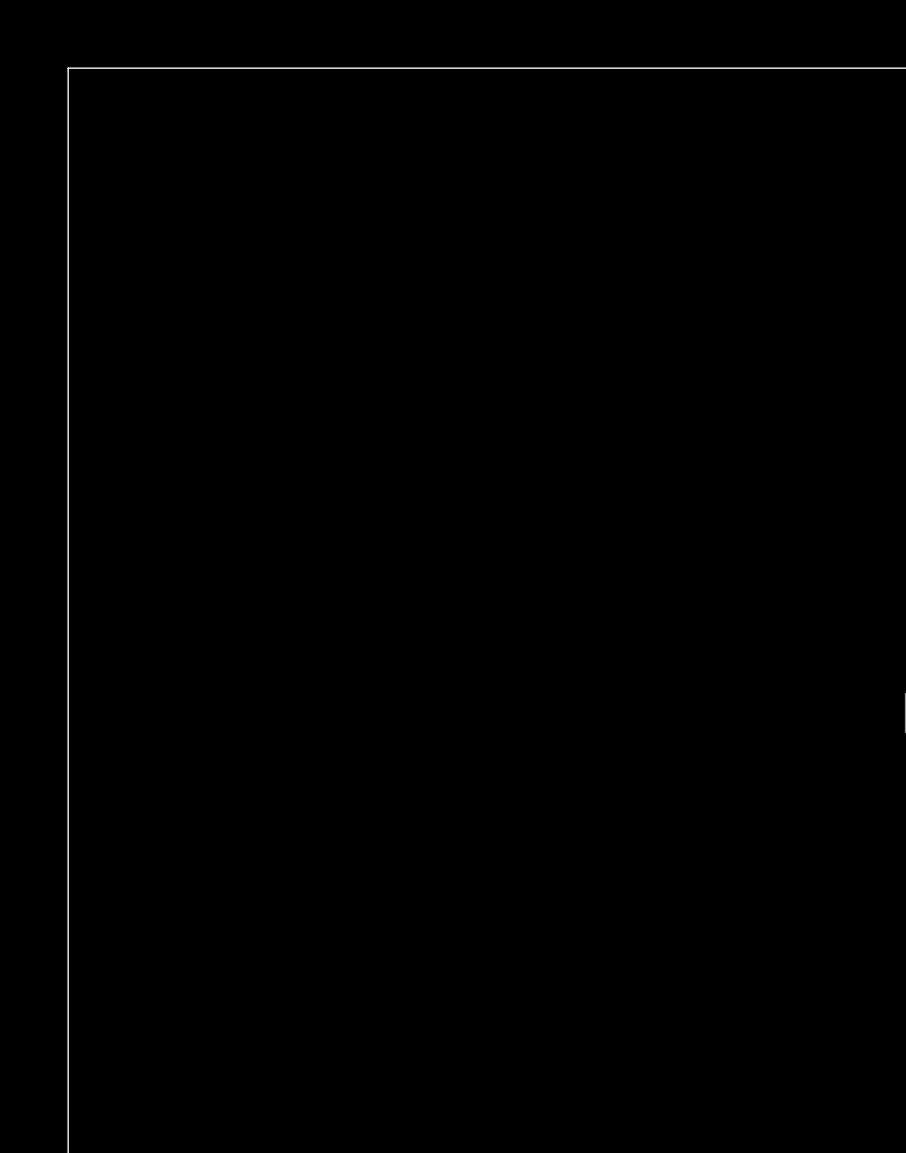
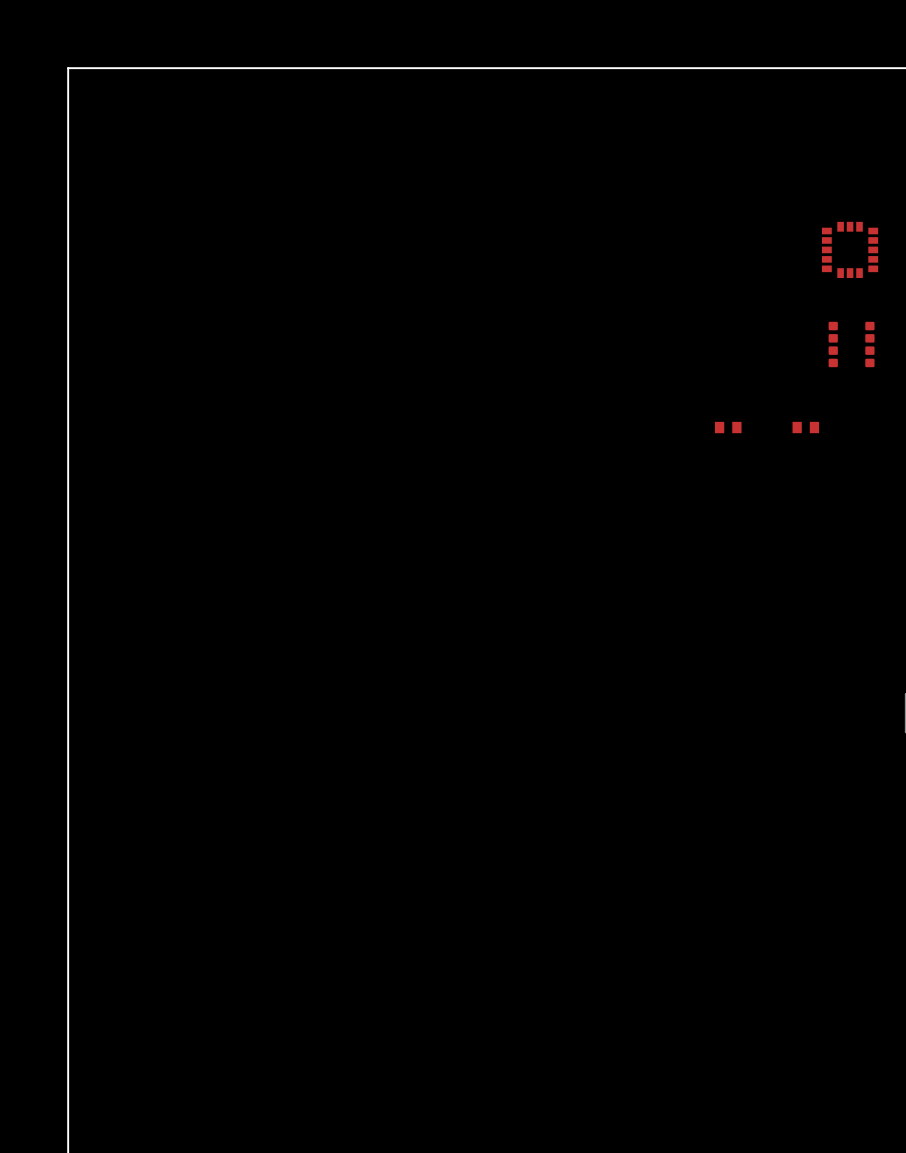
part: none -> (850, 249)
part: none -> (851, 344)
part: none -> (728, 427)
part: none -> (805, 427)

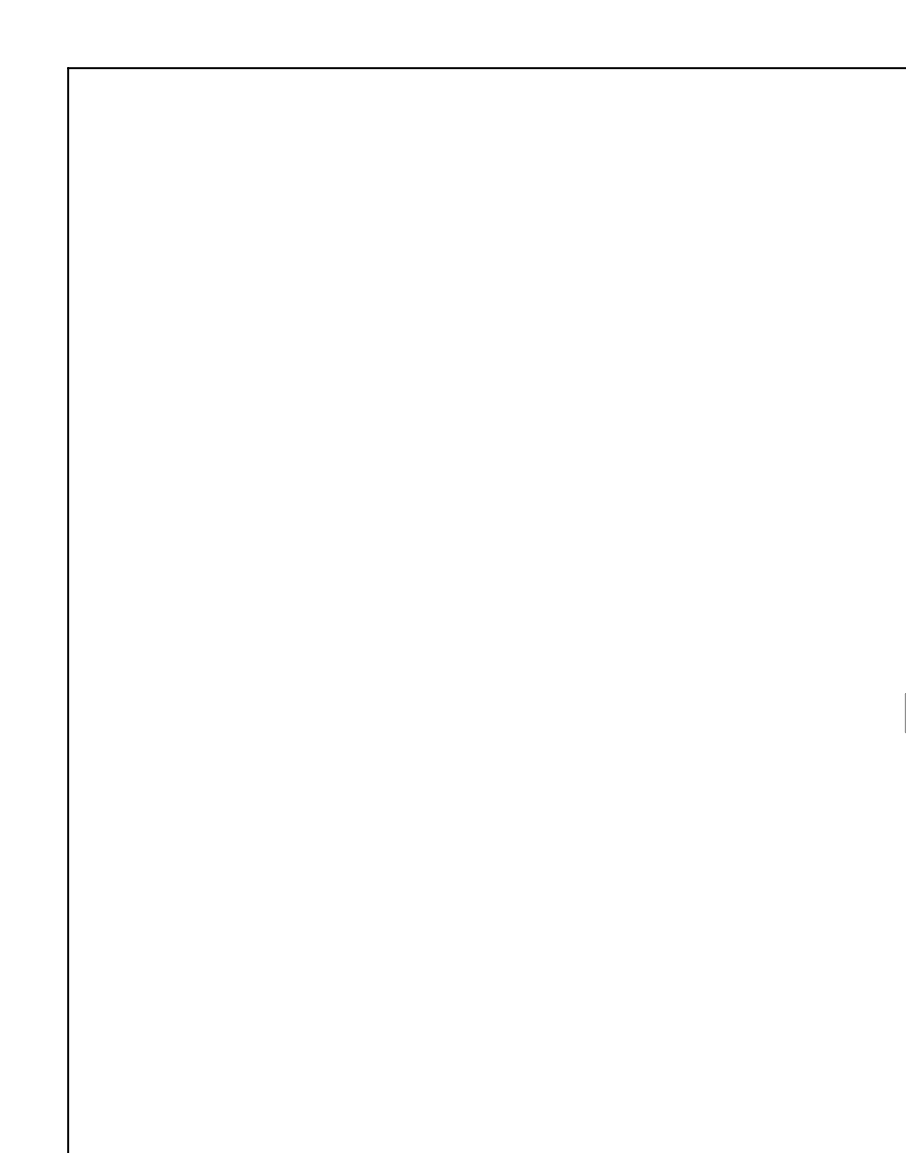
part: (850, 249) -> none
part: (851, 344) -> none
part: (728, 427) -> none
part: (805, 427) -> none

